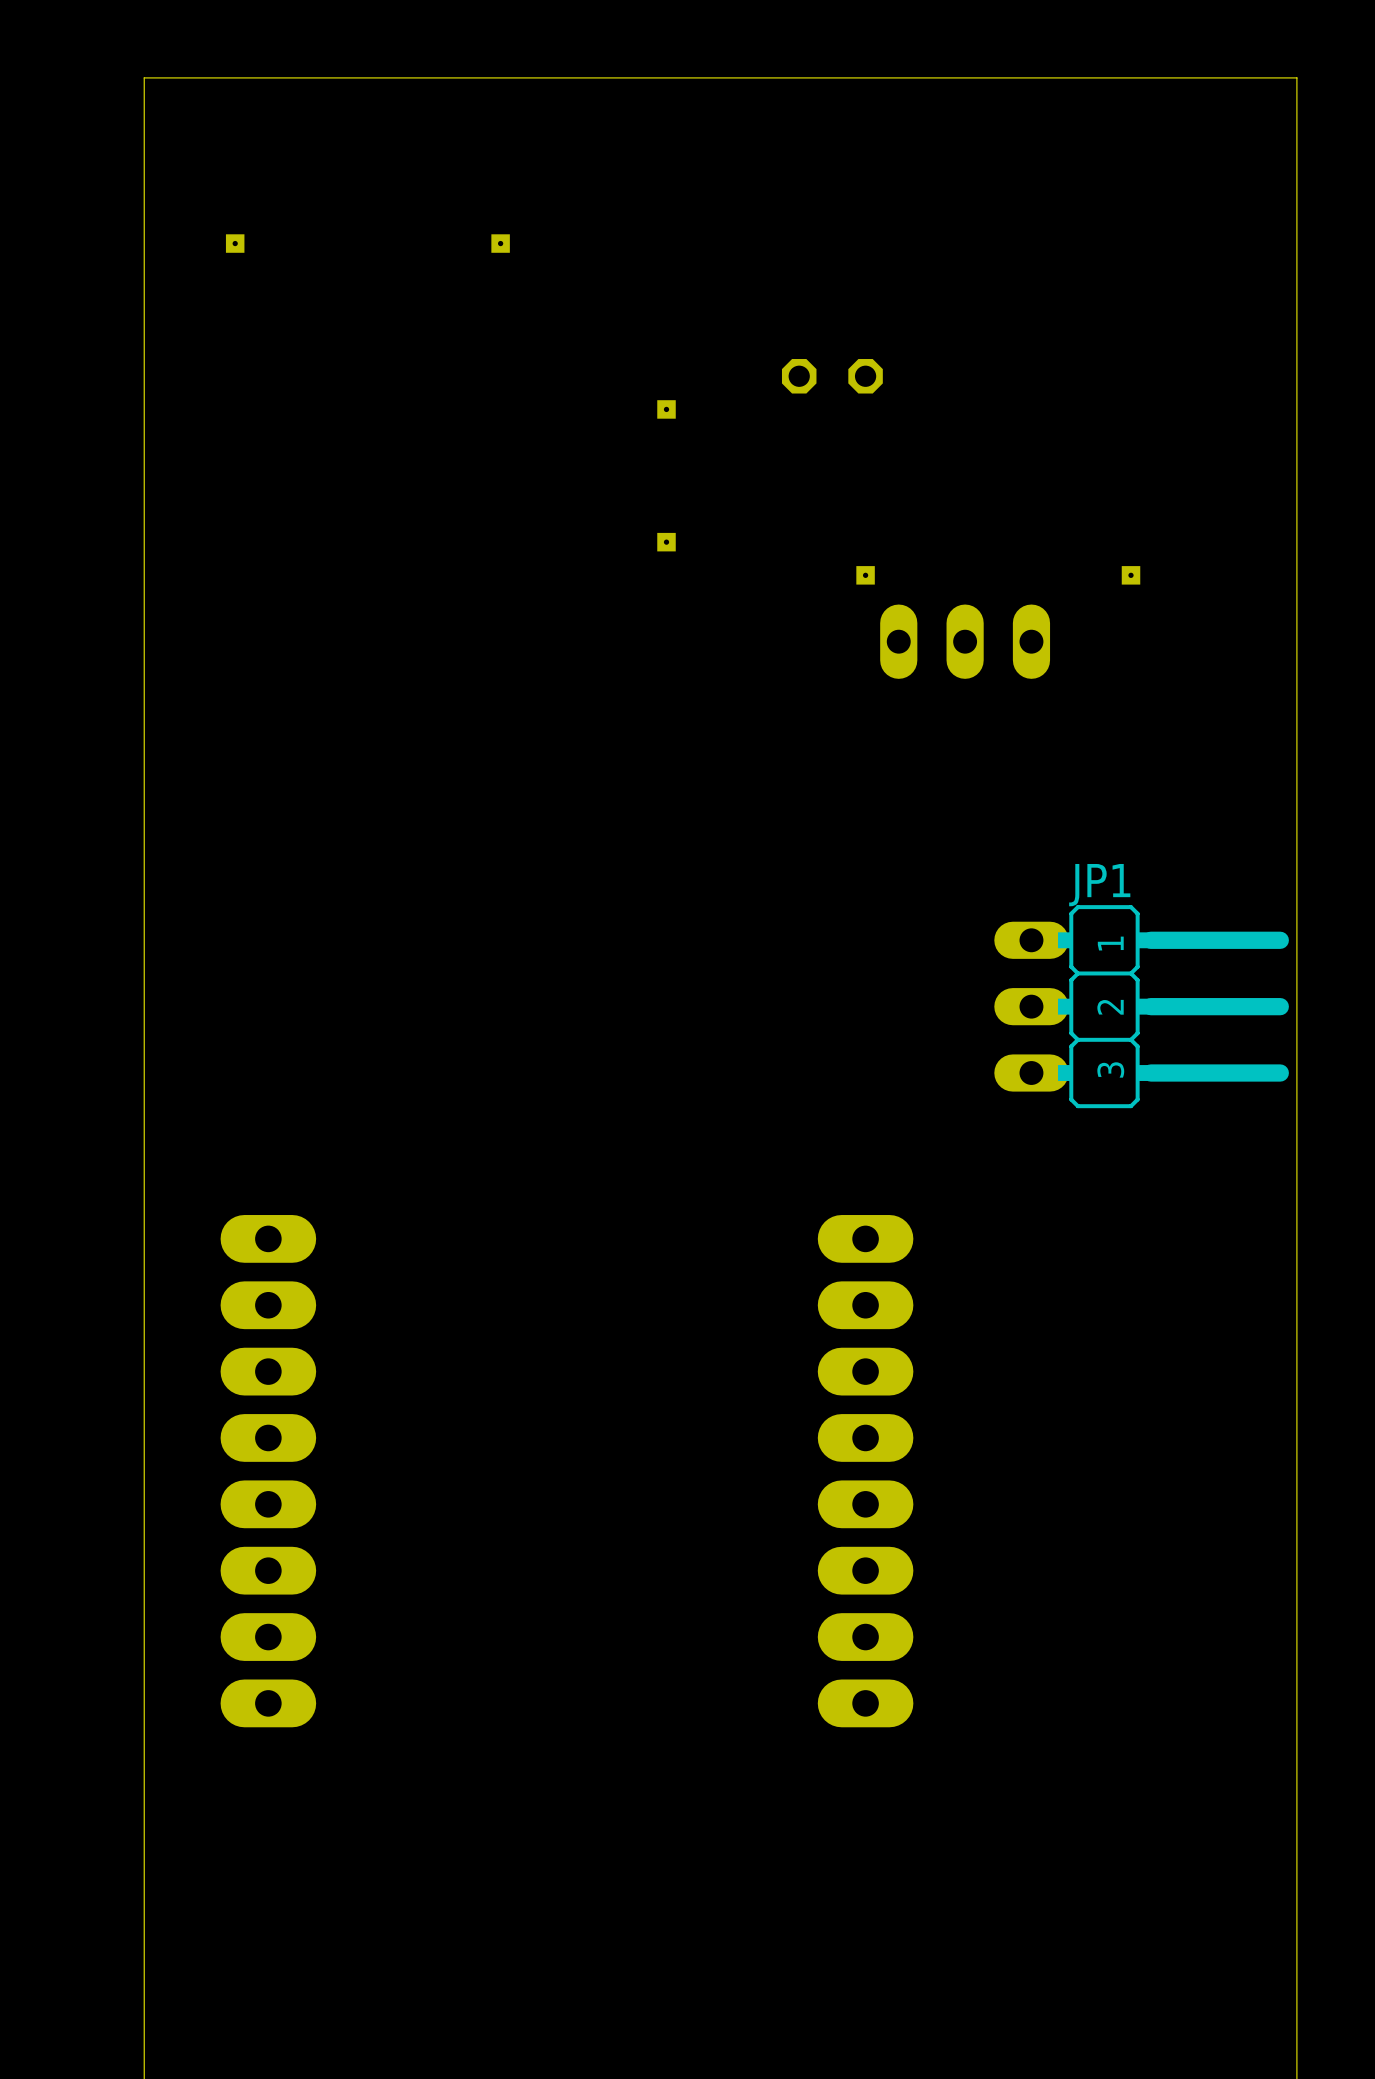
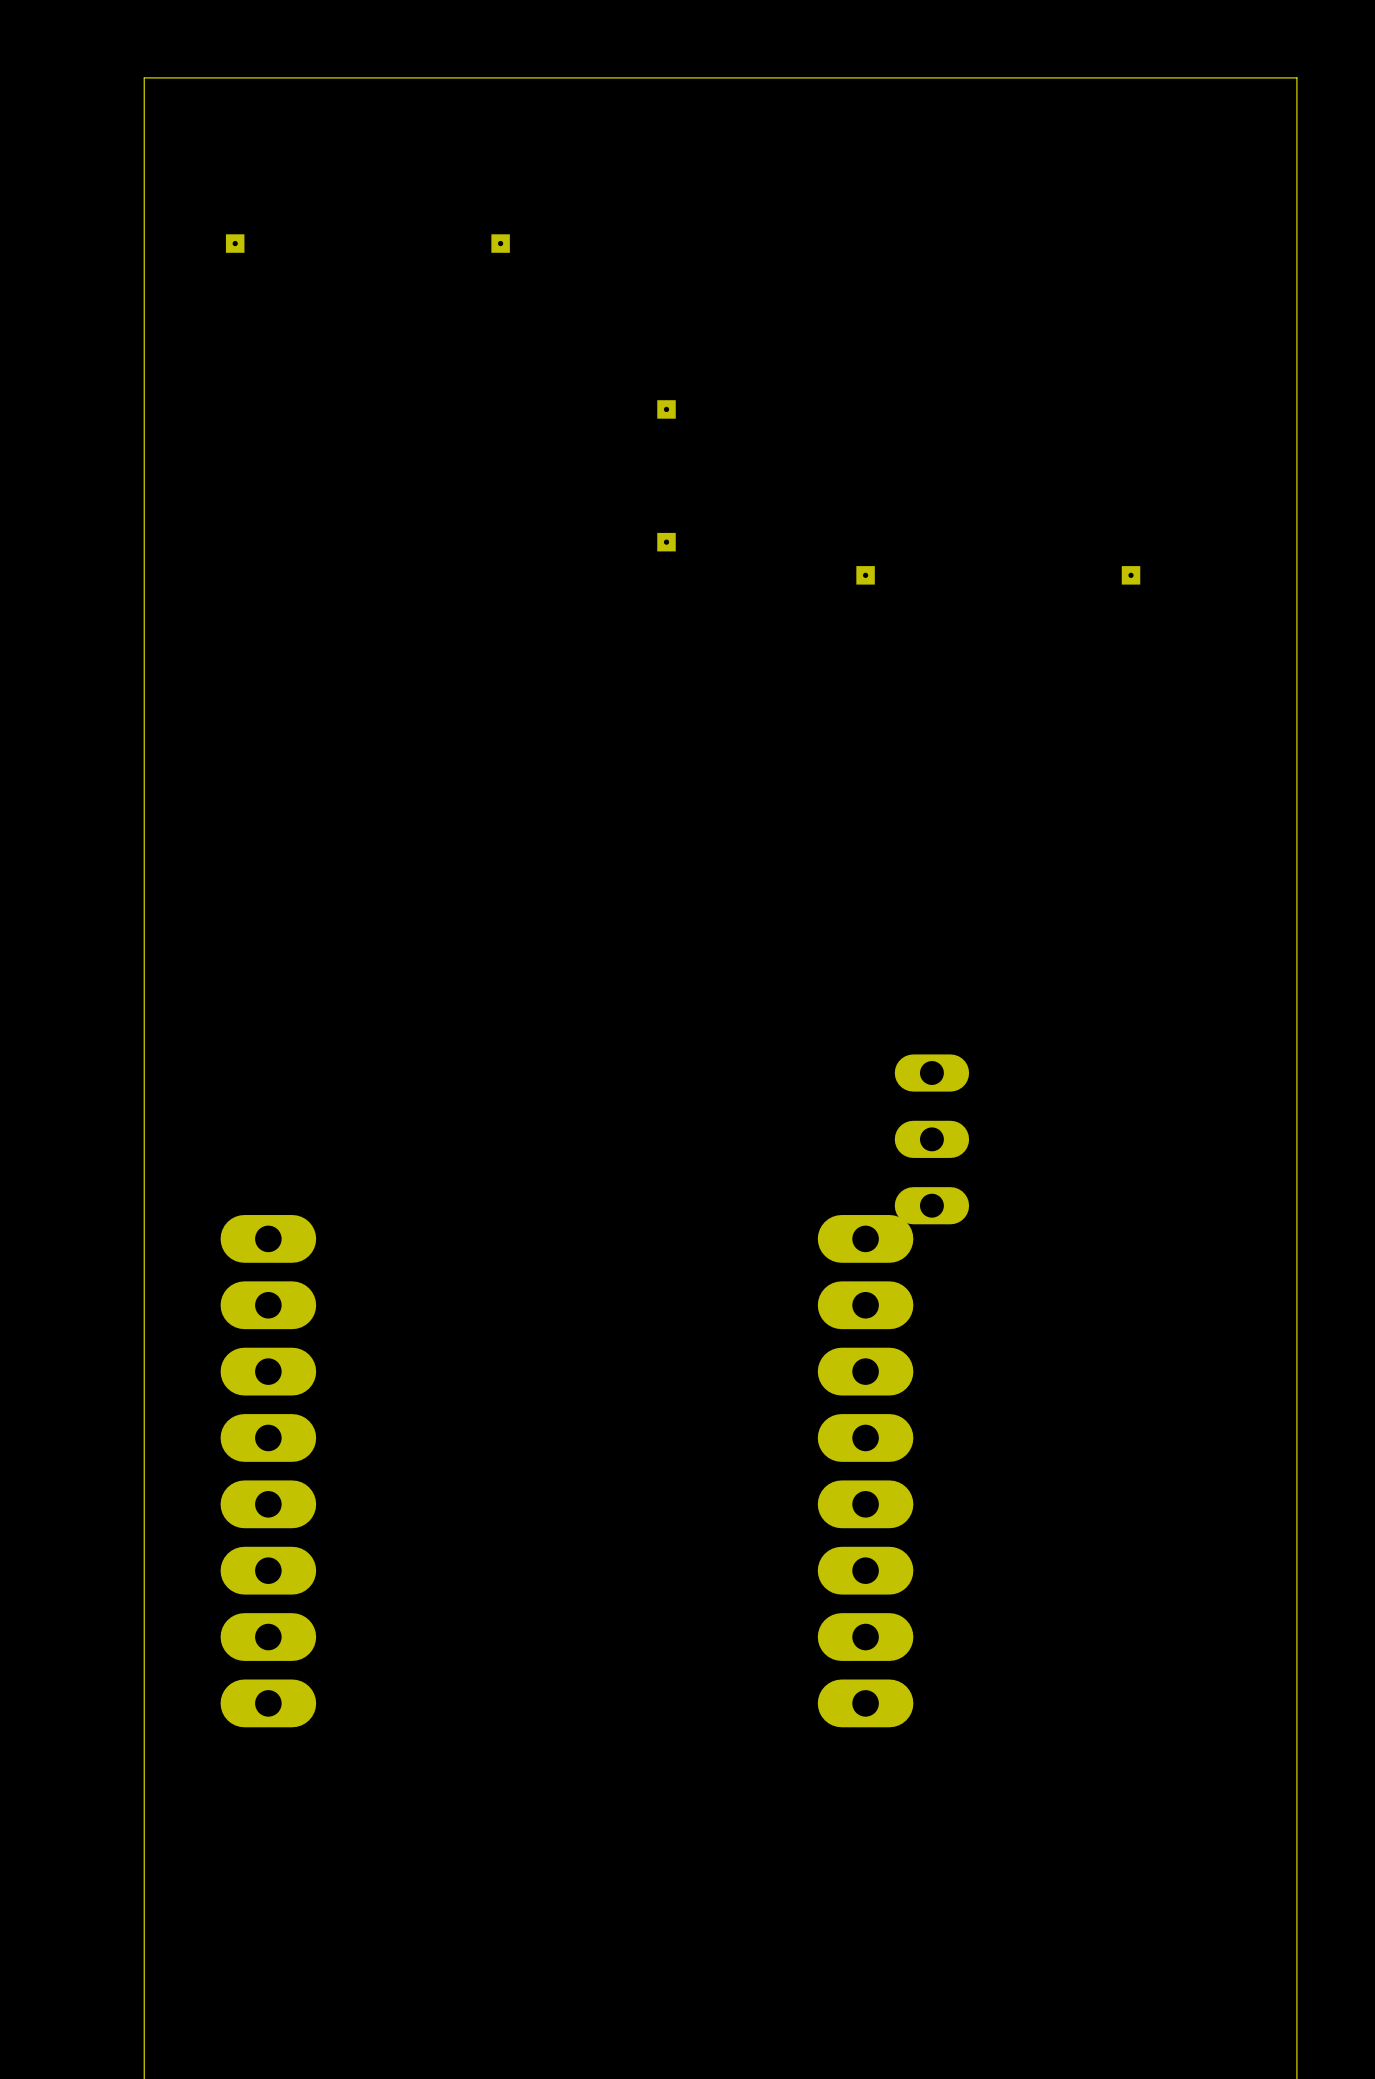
part: (832, 376) -> none
part: (965, 641) -> none
JP1 side: bottom (1141, 1006) -> top (931, 1139)

